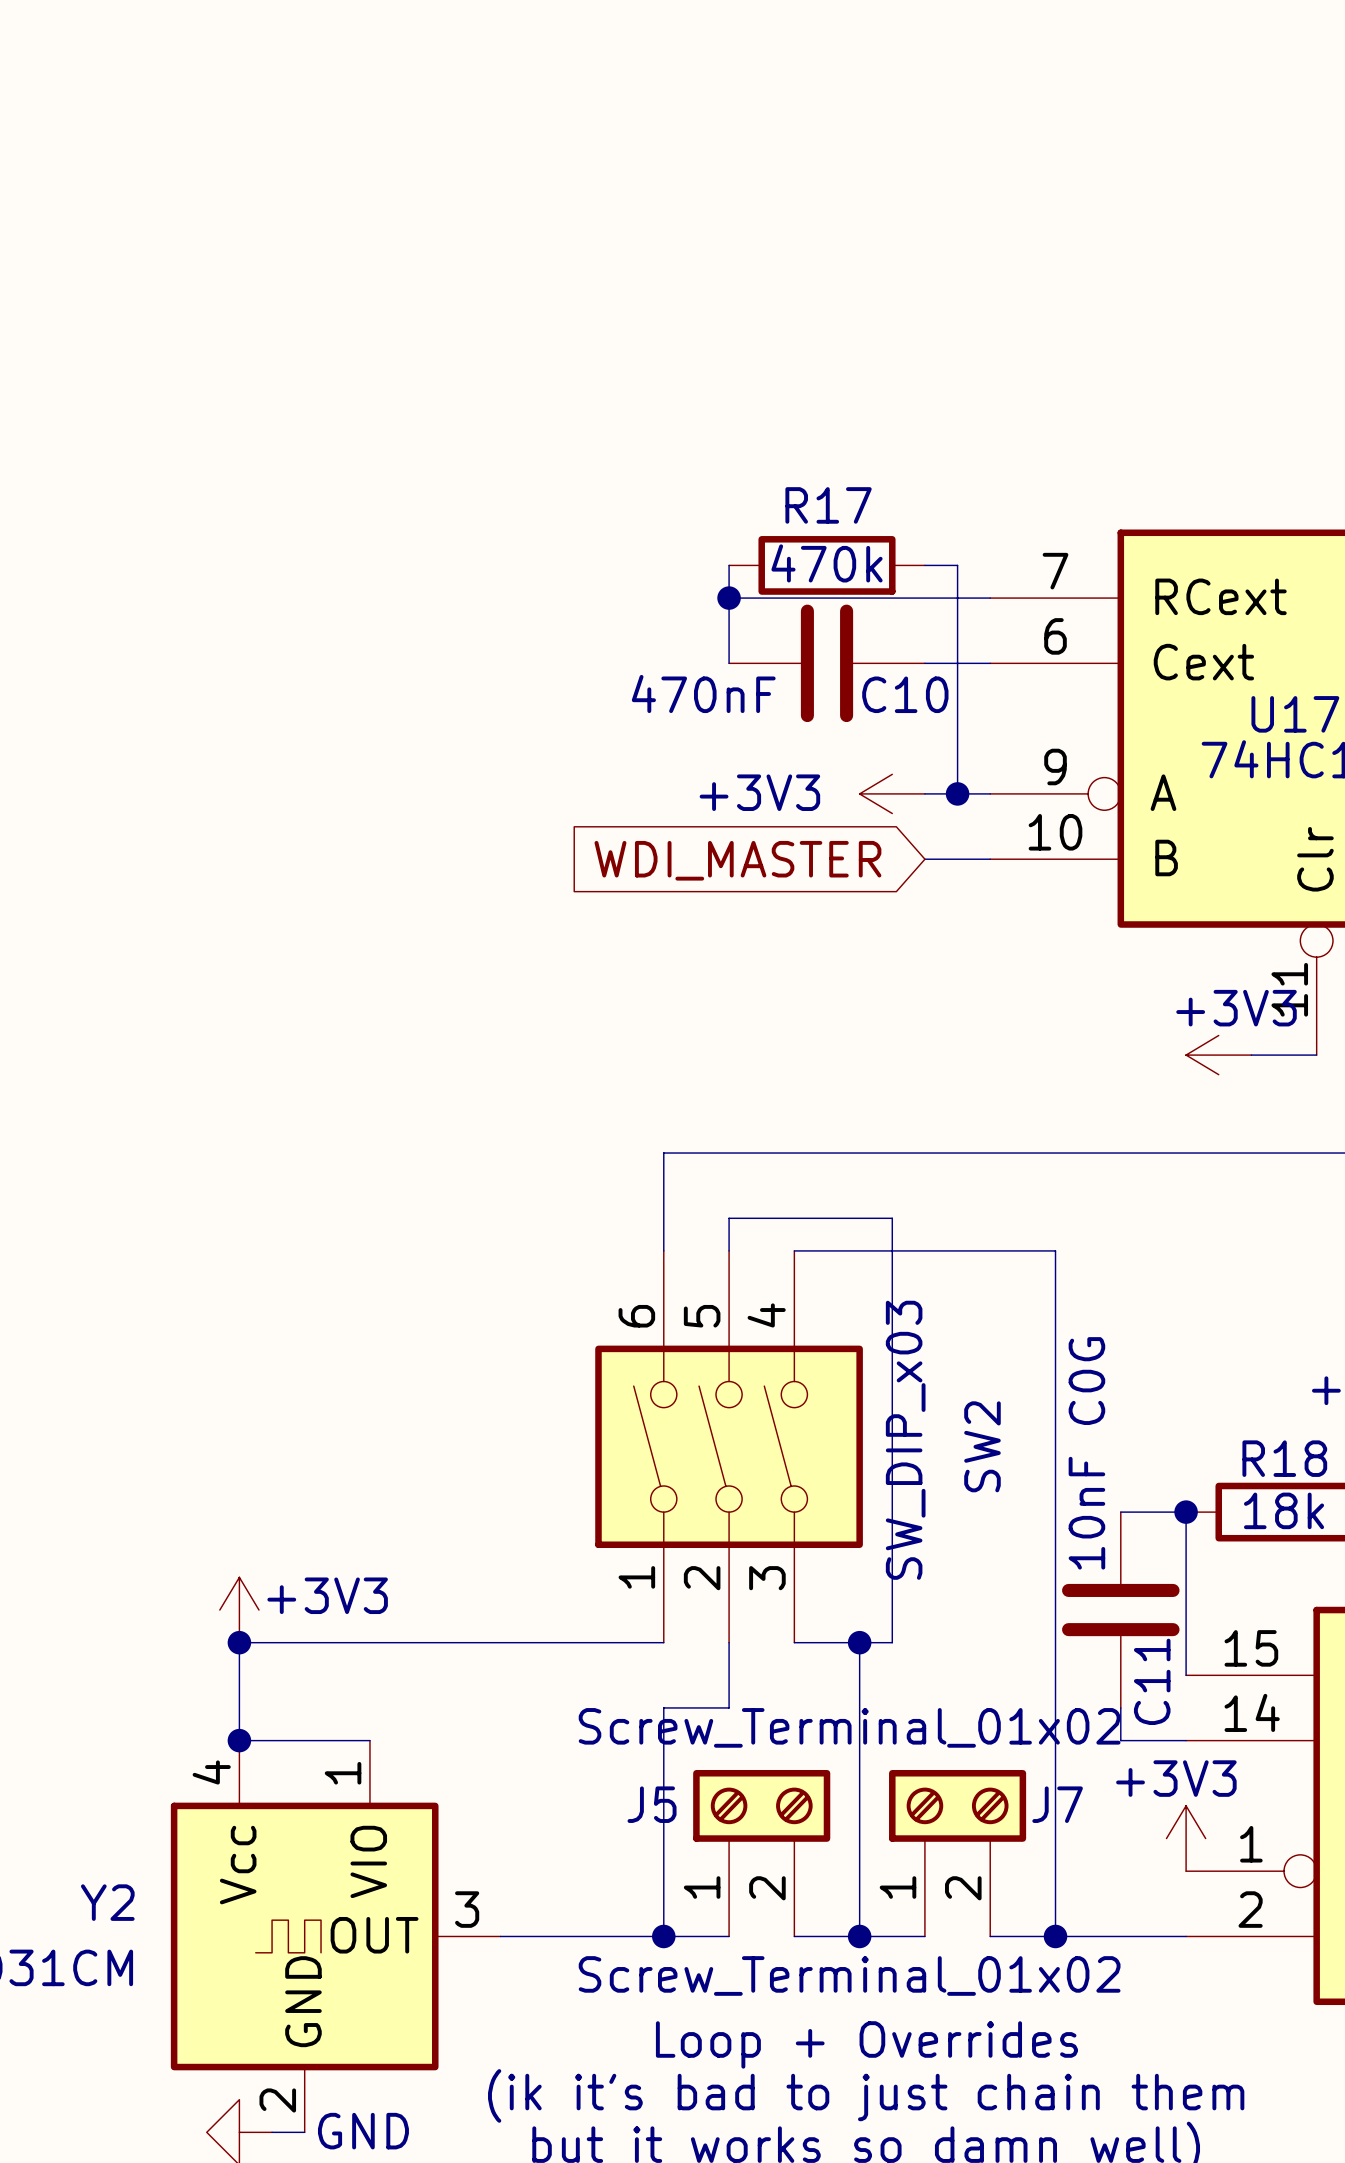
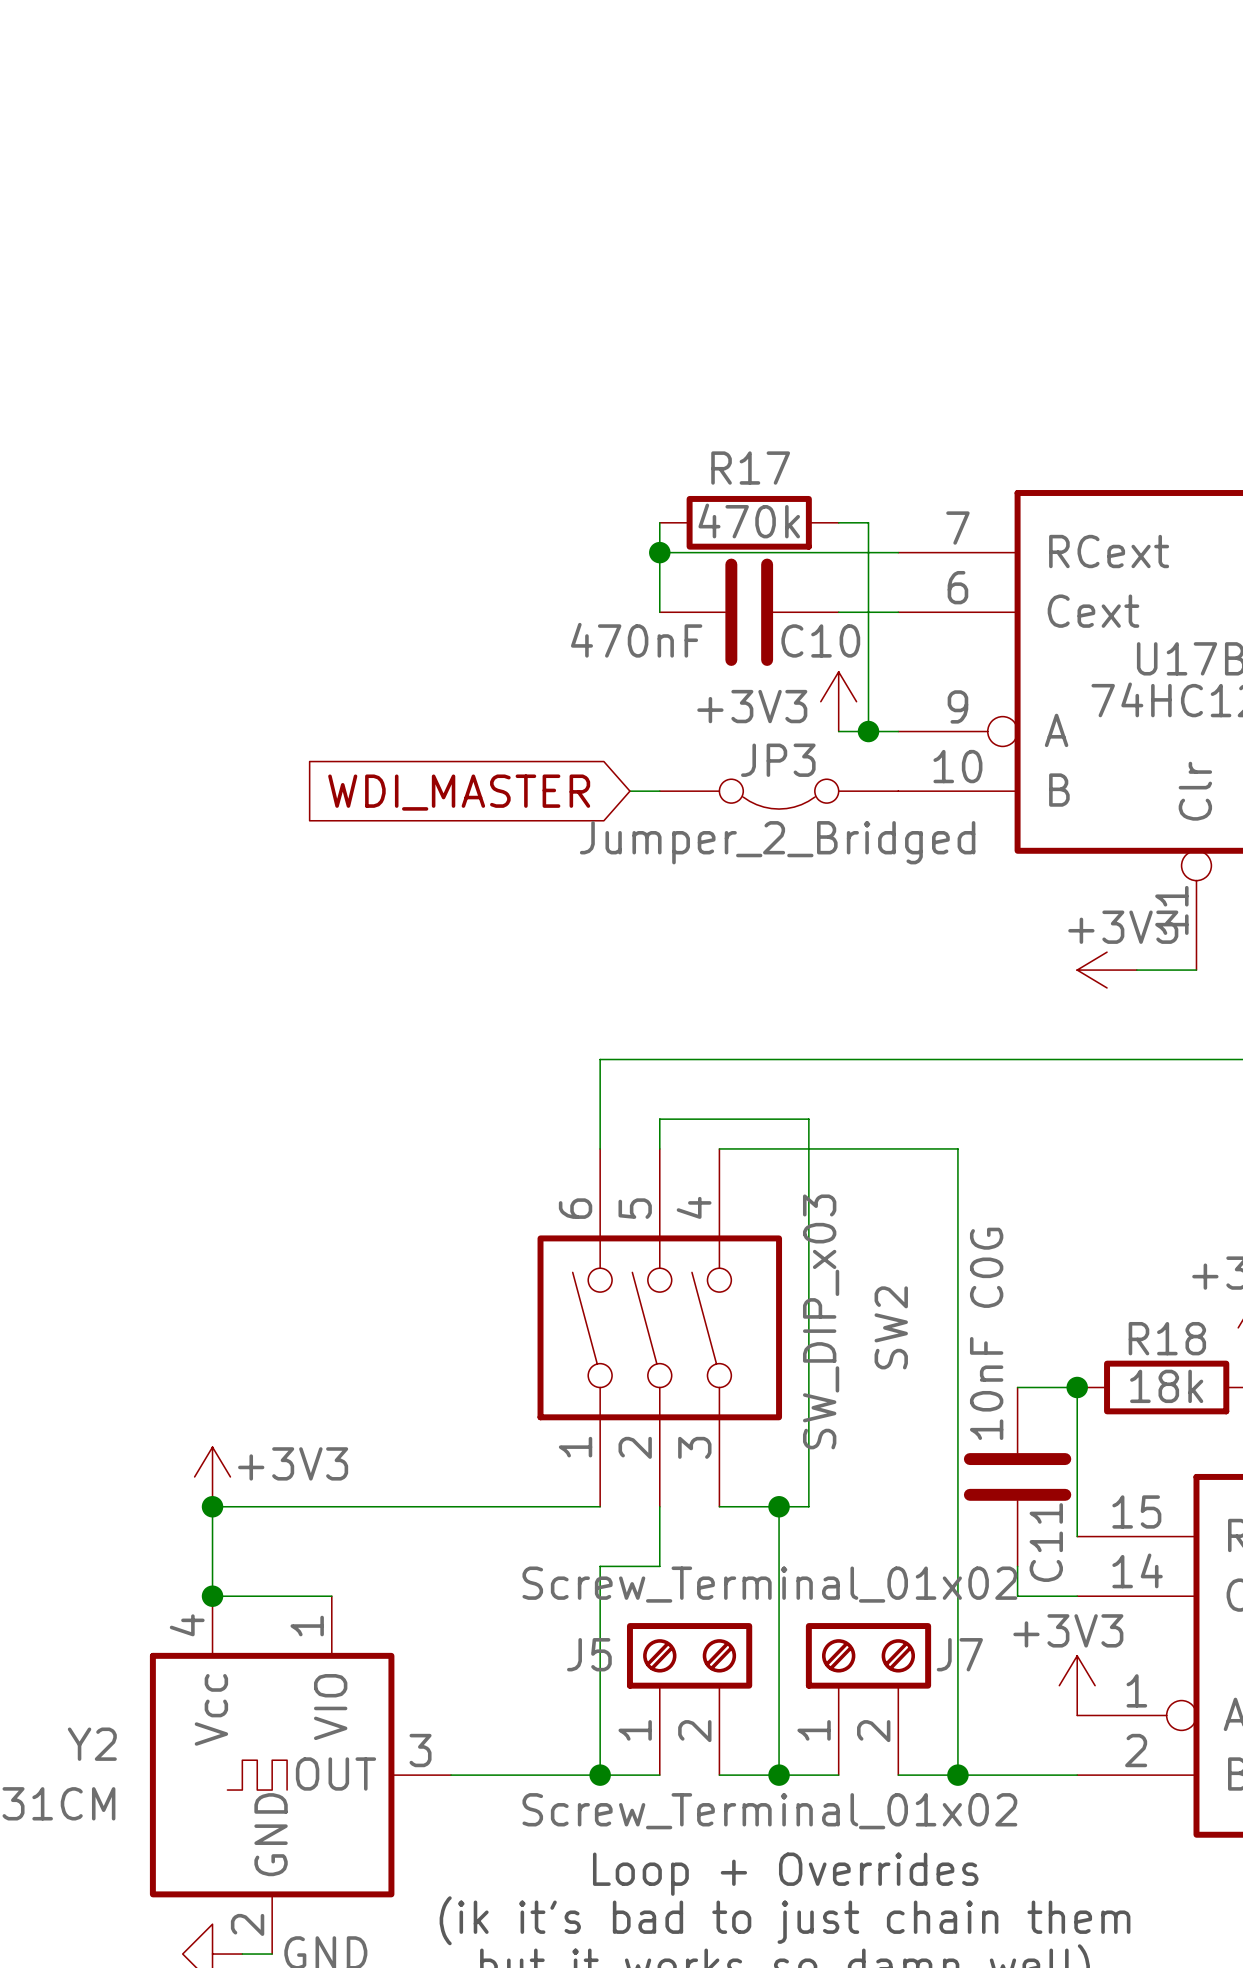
power symbol text position: +3V3 (759, 792) -> +3V3 (752, 706)
power symbol rotation: 0° (892, 793) -> 90° clockwise (838, 701)
power symbol position: +3V3 (892, 793) -> +3V3 (838, 701)
wire: none -> (629, 791) (659, 791)
global label position: WDI_MASTER (737, 860) -> WDI_MASTER (459, 792)
JP3: none -> Jumper_2_Bridged (779, 794)

